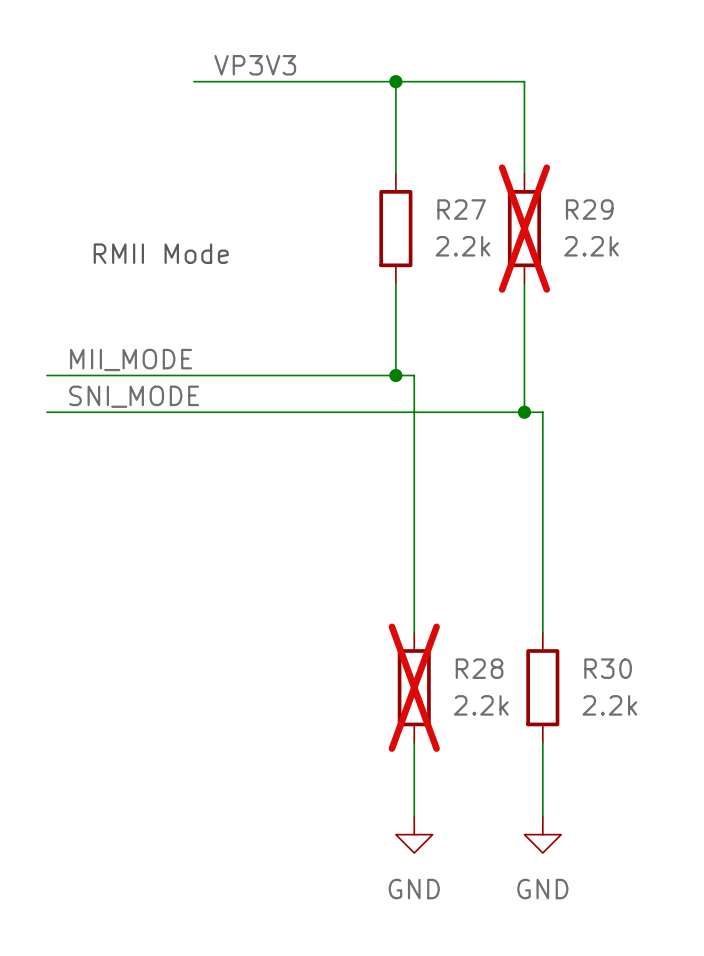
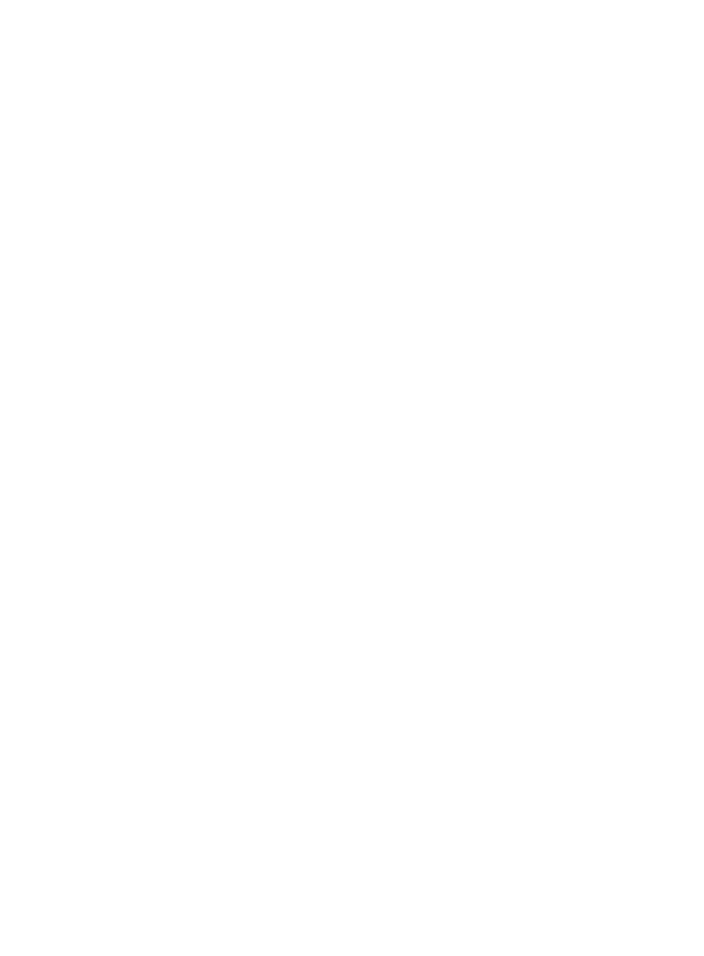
label: VP3V3 (255, 65) -> none
wire: (193, 81) (524, 81) (524, 173) -> none
wire: (395, 81) (395, 173) -> none
junction: (395, 81) -> none
R27: 2.2k (395, 228) -> none
R29: 2.2k (524, 228) -> none
text: RMII Mode (161, 253) -> none
wire: (395, 283) (395, 375) -> none
wire: (524, 283) (524, 412) -> none
label: MII_MODE (131, 359) -> none
wire: (46, 375) (414, 375) (414, 632) -> none
junction: (395, 375) -> none
label: SNI_MODE (134, 396) -> none
wire: (46, 412) (542, 412) (542, 632) -> none
junction: (524, 412) -> none
R28: 2.2k (414, 687) -> none
R30: 2.2k (542, 687) -> none
wire: (414, 742) (414, 816) -> none
wire: (542, 742) (542, 816) -> none
power symbol: GND (414, 834) -> none
power symbol: GND (542, 834) -> none

